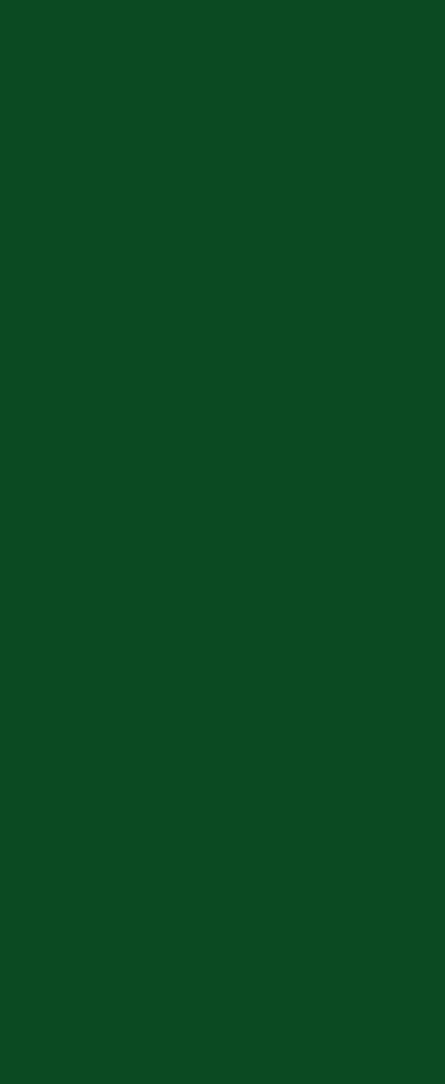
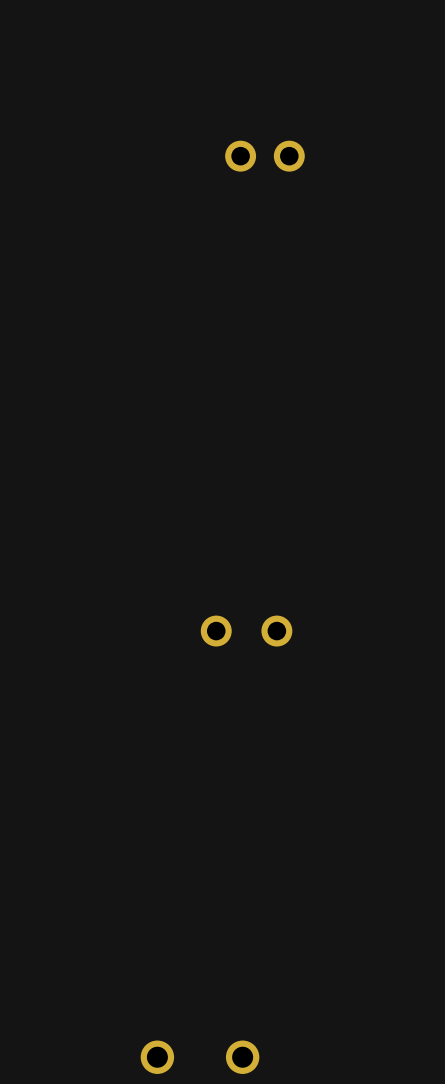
part: none -> (264, 156)
part: none -> (246, 631)
part: none -> (200, 1057)

